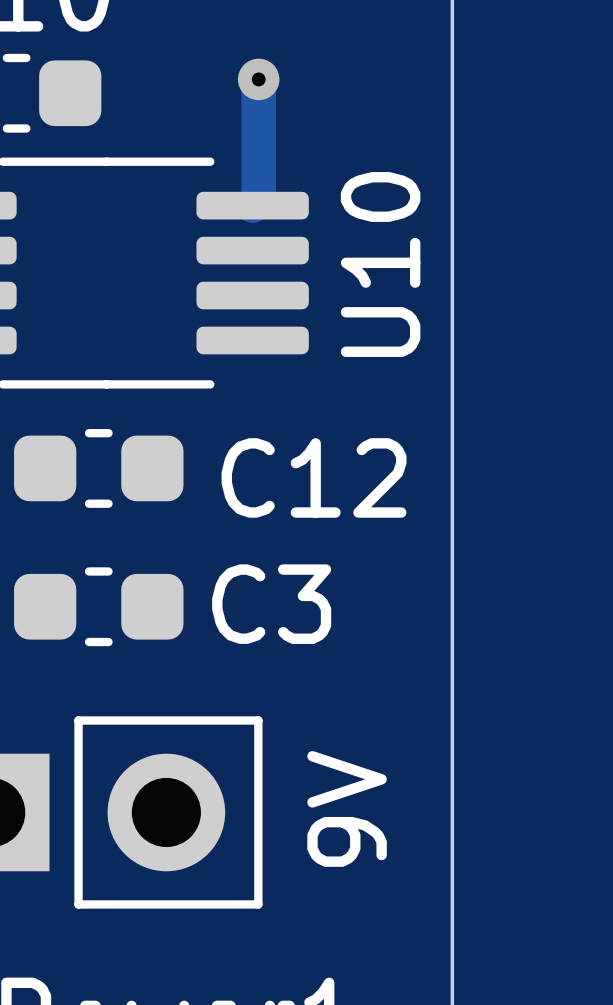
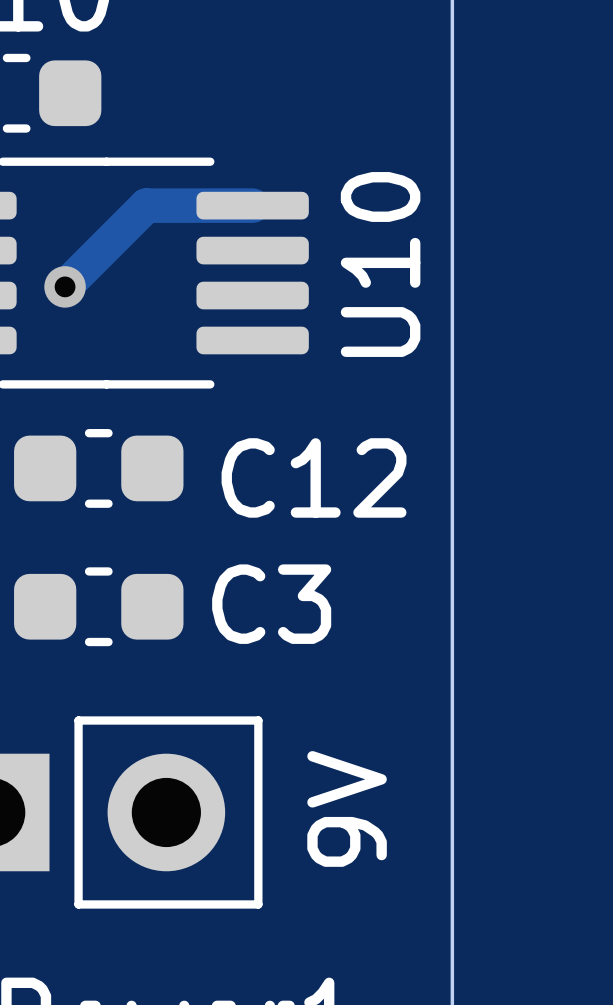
track: (258, 79) (258, 199) (252, 205) -> (65, 286) (146, 205) (252, 205)
via: (258, 79) -> none
via: none -> (65, 286)

